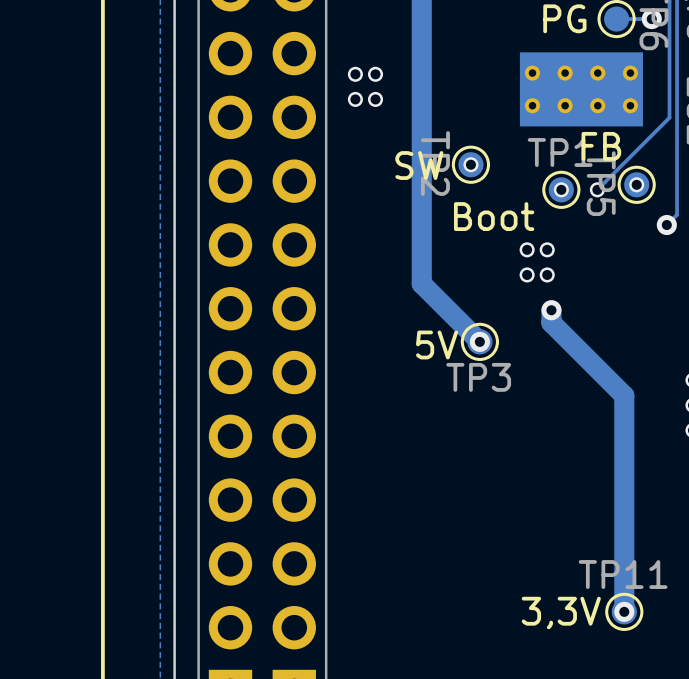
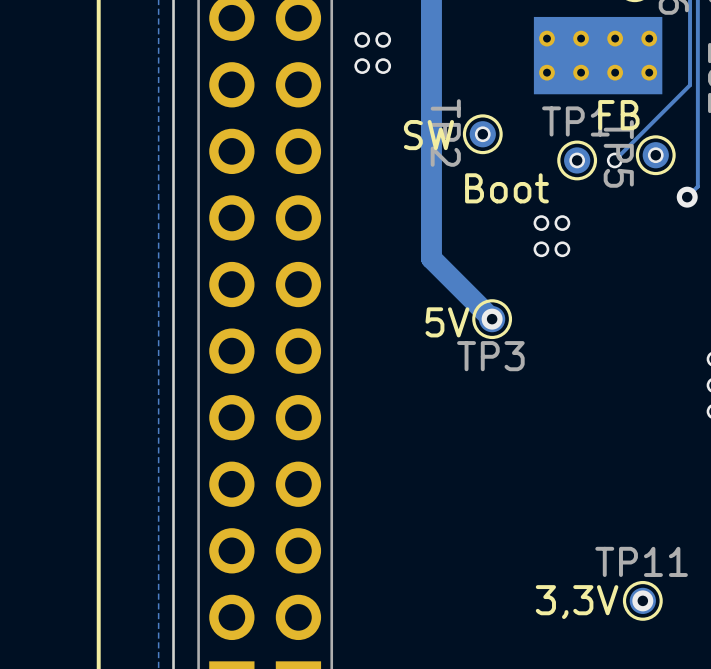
track: (551, 310) (551, 322) (624, 395) (624, 611) -> none
via: (551, 310) -> none

